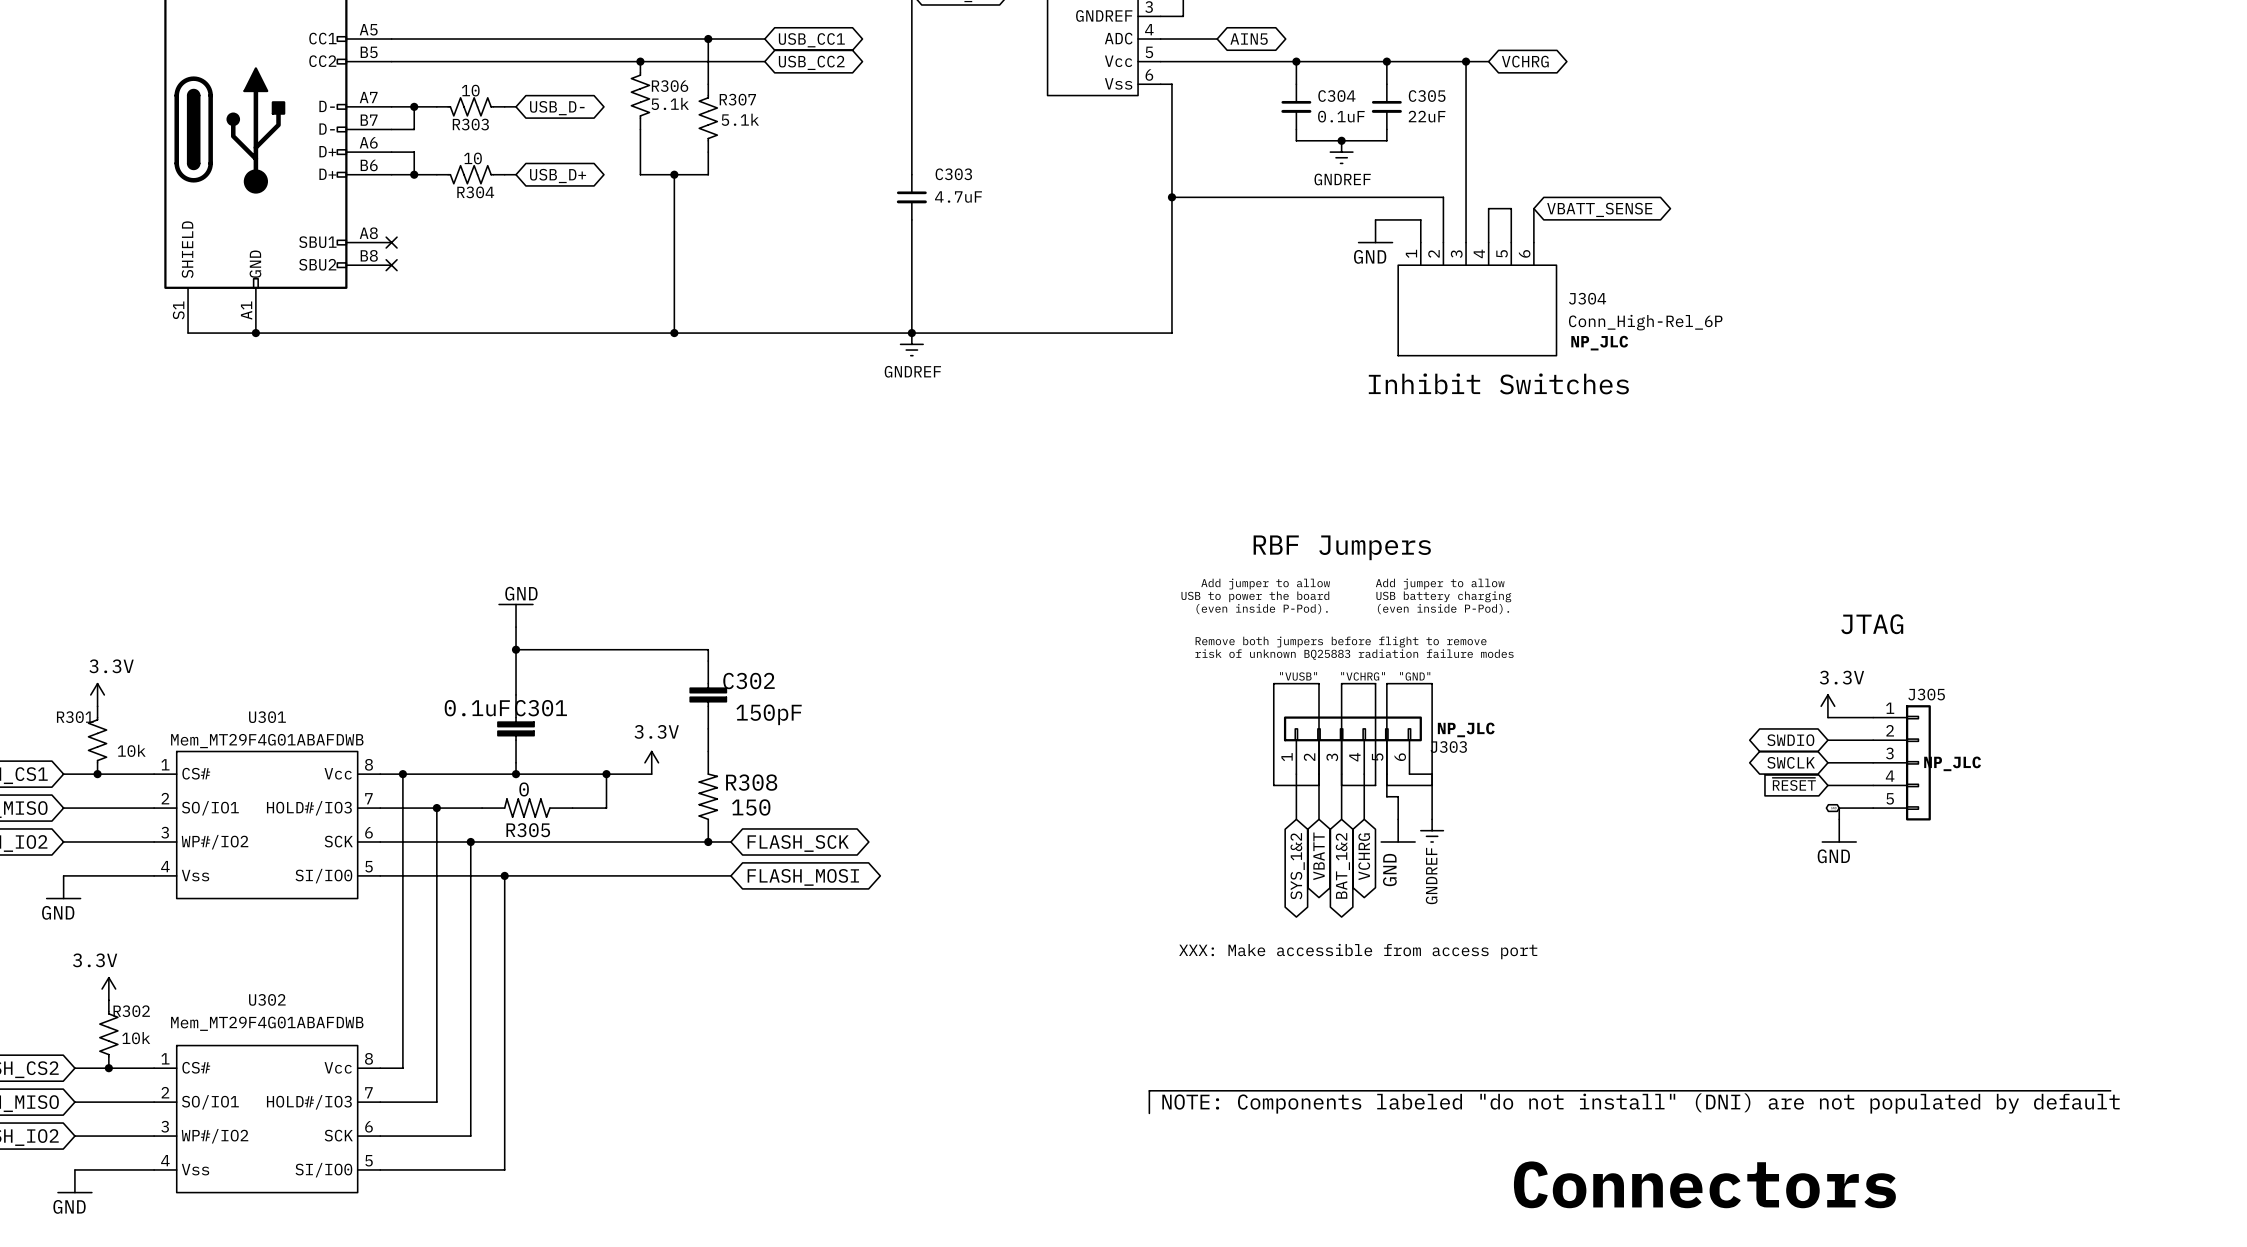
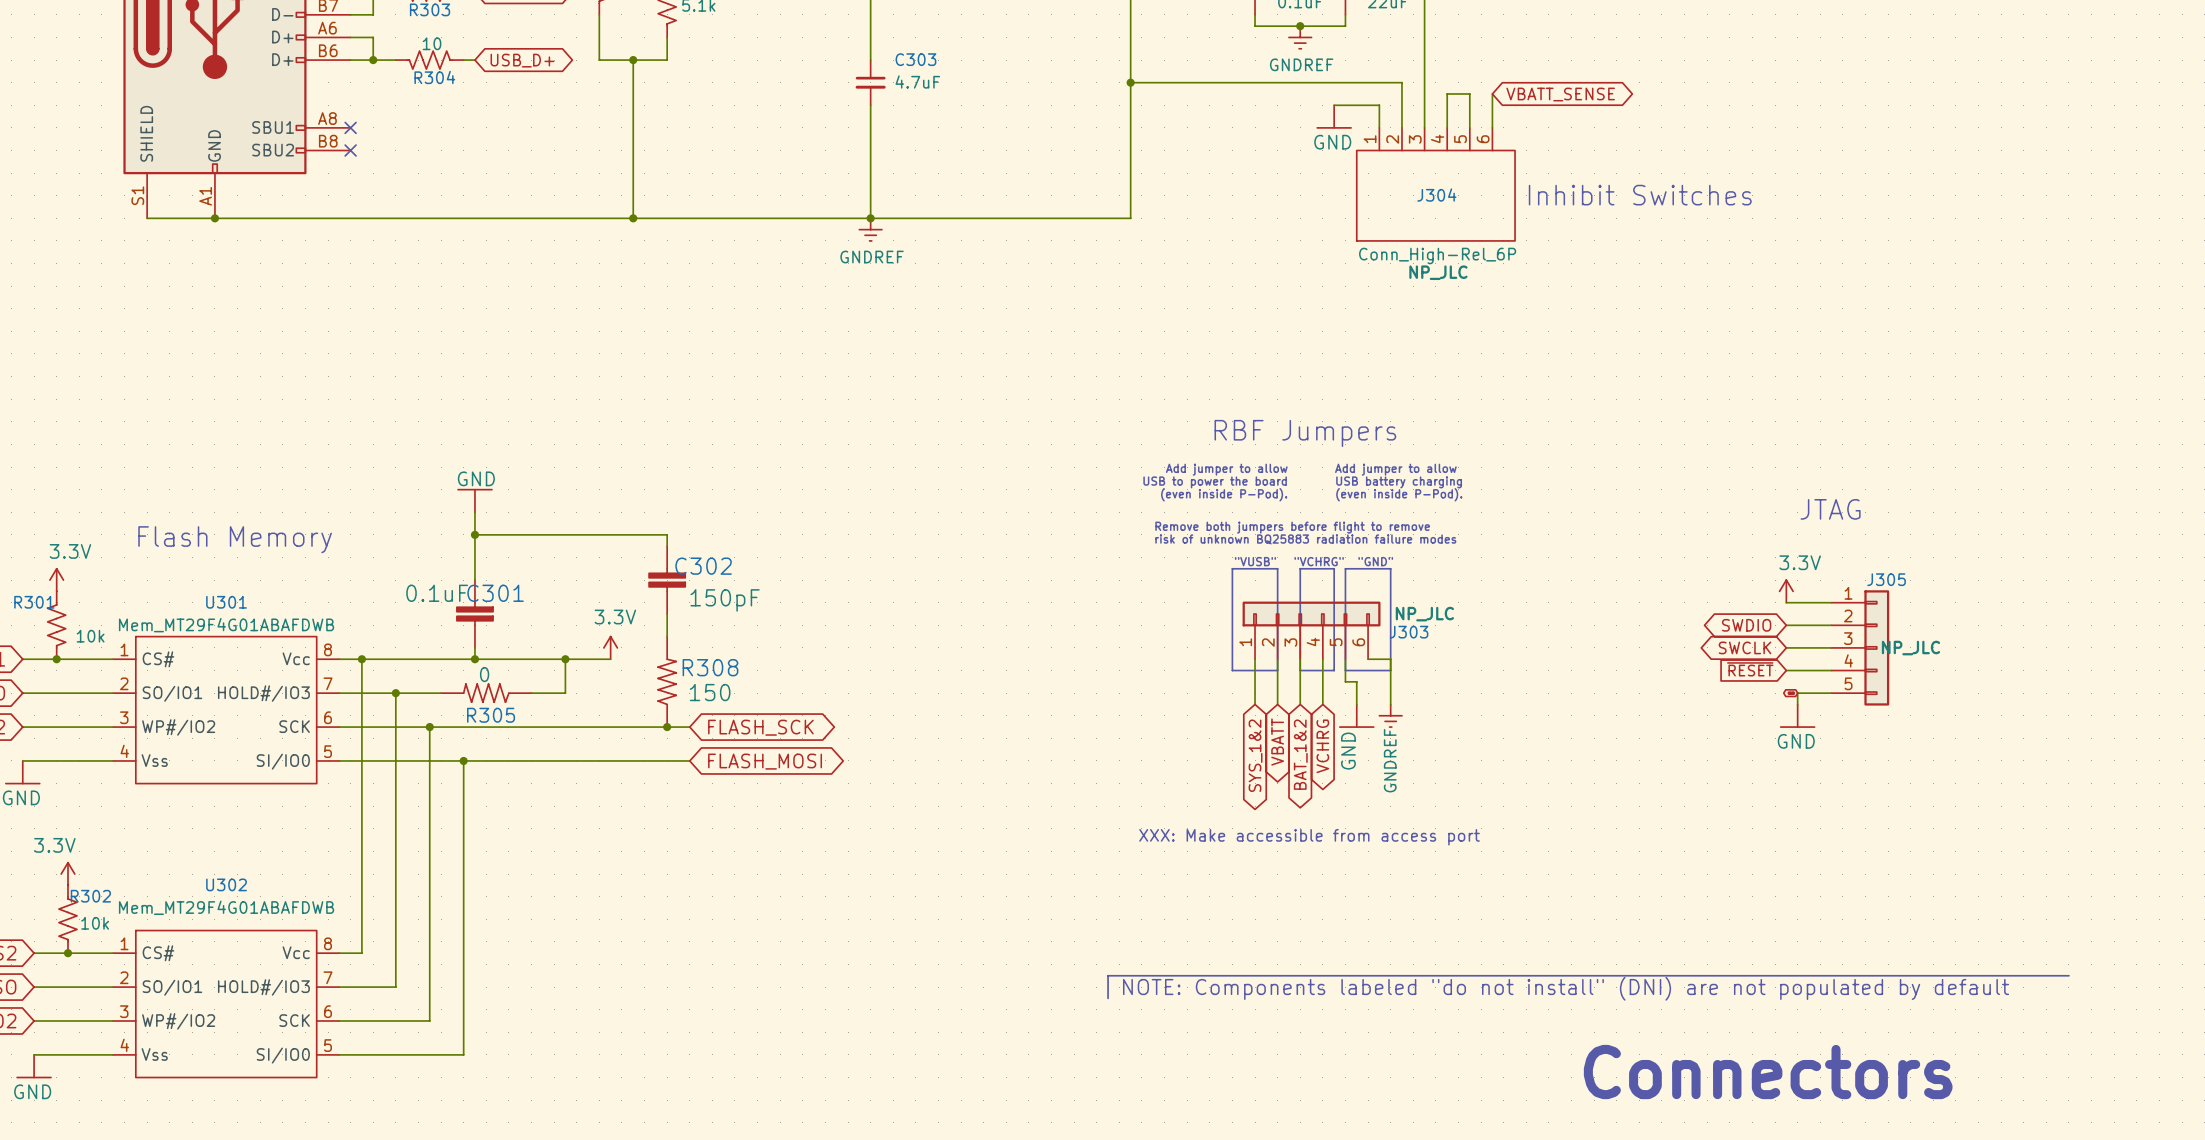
J304 name position: J304 (1587, 298) -> J304 (1436, 195)
J304 value position: Conn_High-Rel_6P (1645, 322) -> Conn_High-Rel_6P (1437, 255)
J304 text position: NP_JLC (1599, 343) -> NP_JLC (1438, 272)
text position: Inhibit Switches (1498, 383) -> Inhibit Switches (1640, 195)
text: none -> Flash Memory (235, 539)
text position: Connectors (1704, 1184) -> Connectors (1768, 1072)

